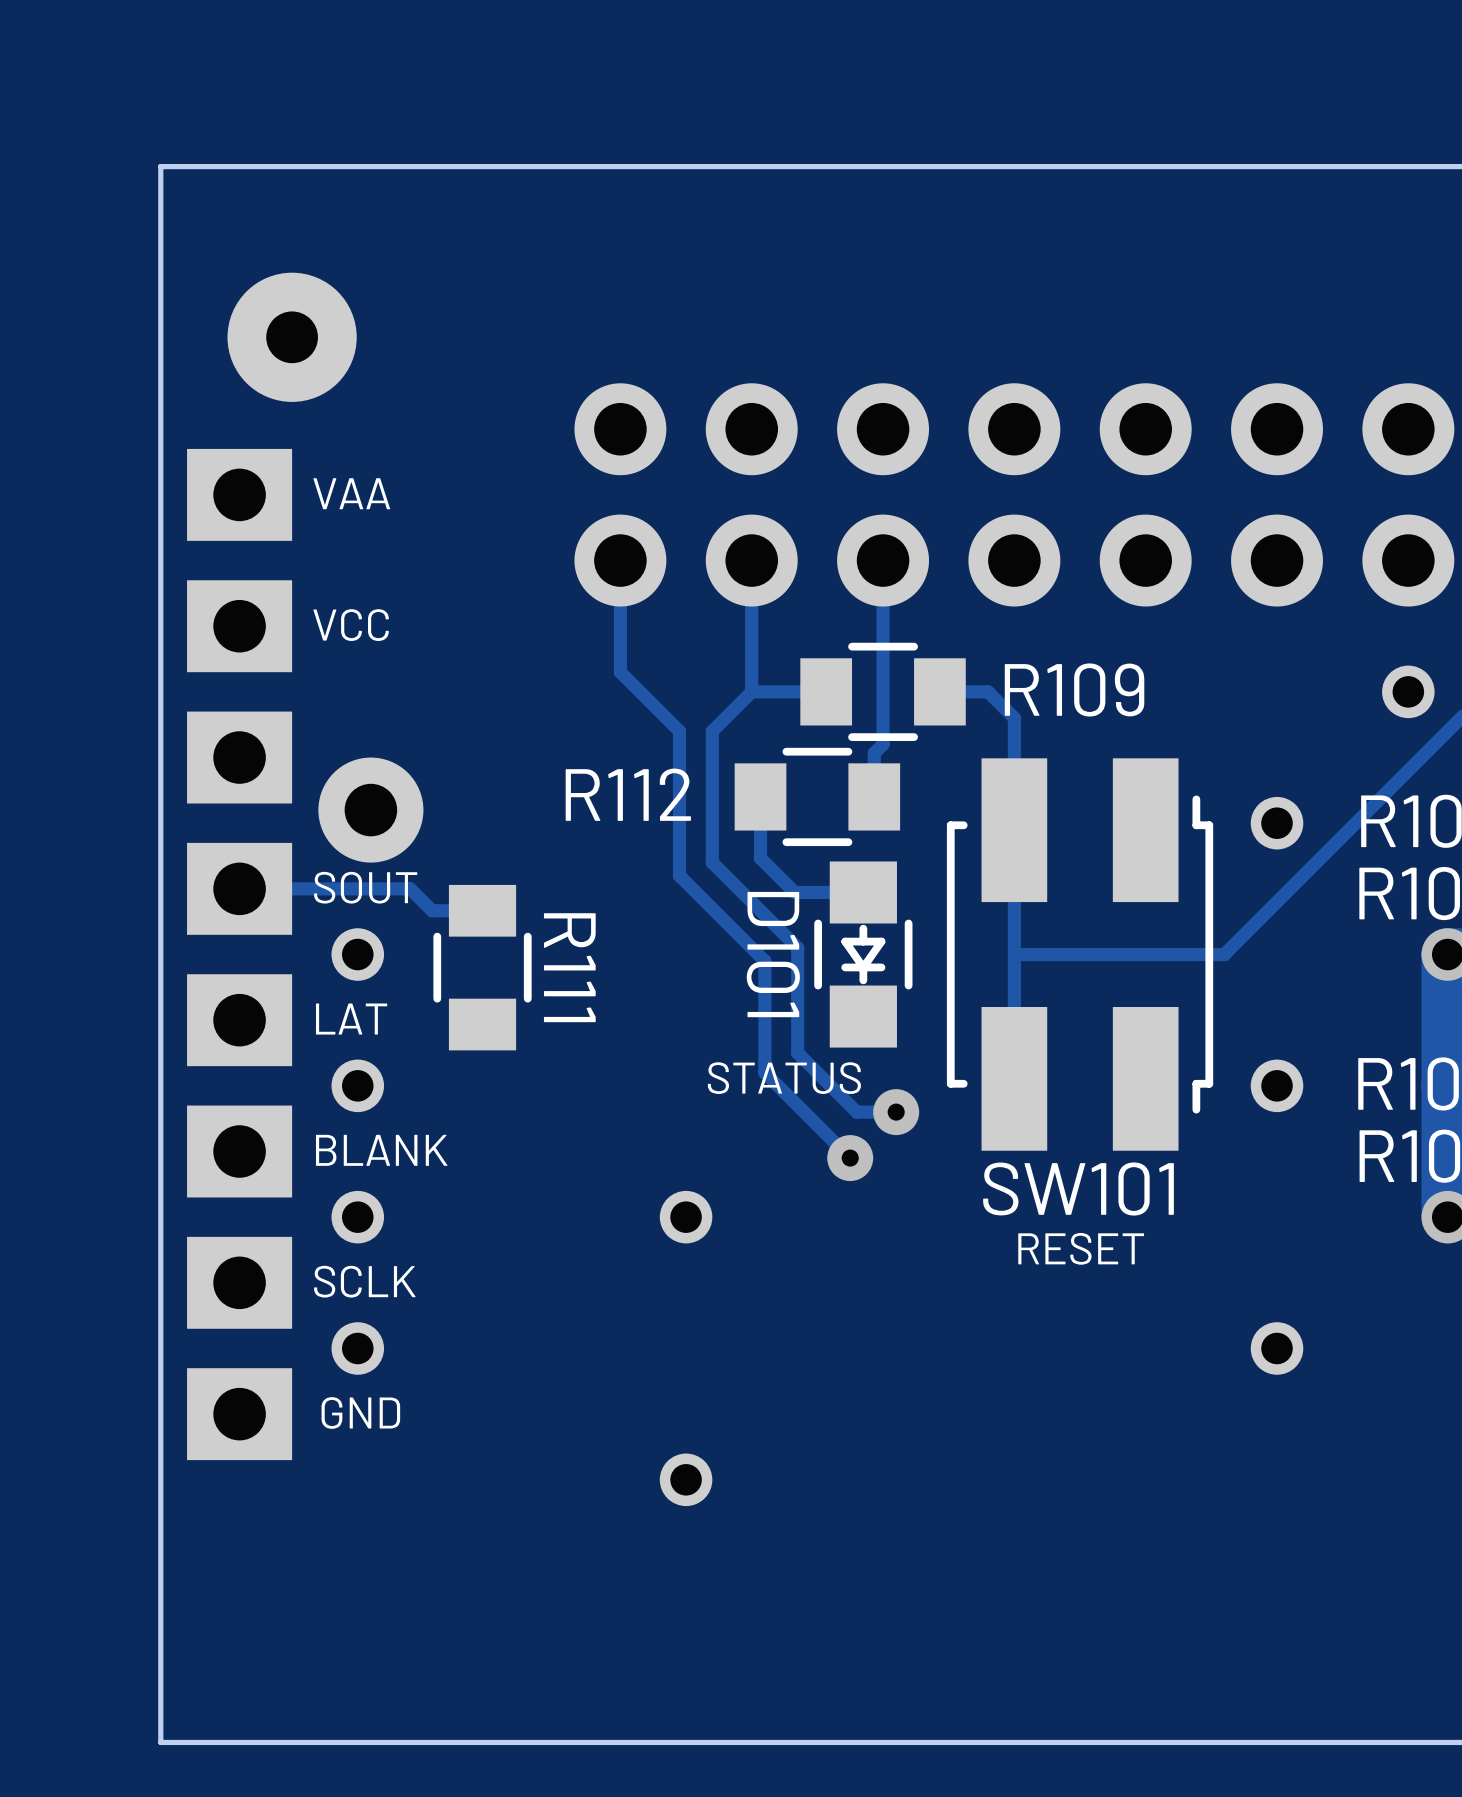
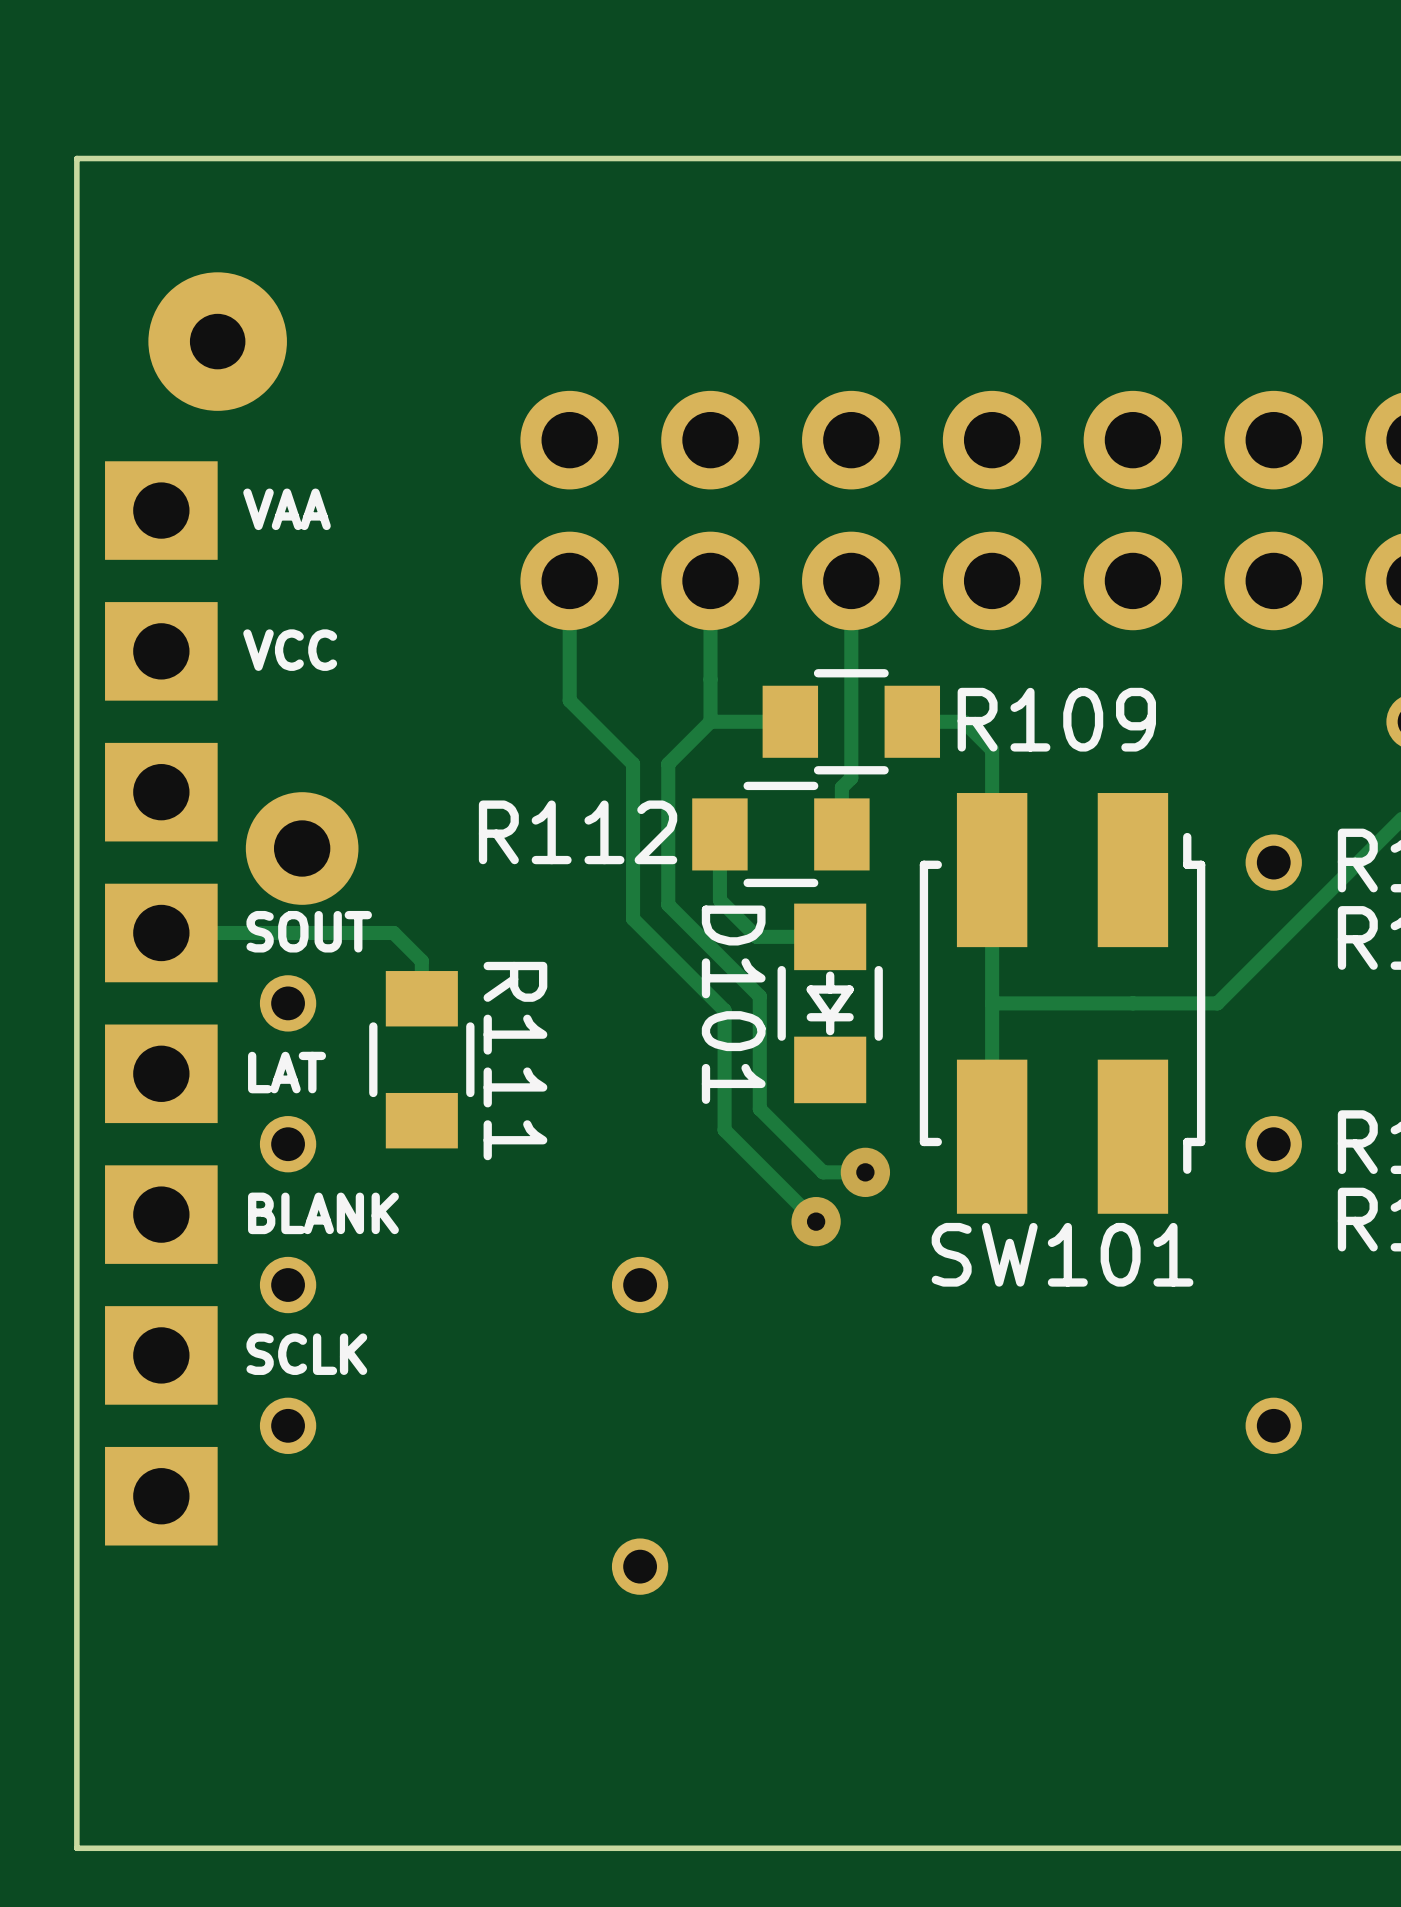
track: (410, 888) (432, 910) (482, 910) -> (344, 932) (393, 932) (421, 961) (421, 998)
R111 position: (482, 967) -> (421, 1059)
text: STATUS (784, 1078) -> none
text: RESET (1081, 1248) -> none
text: GND (360, 1412) -> none

